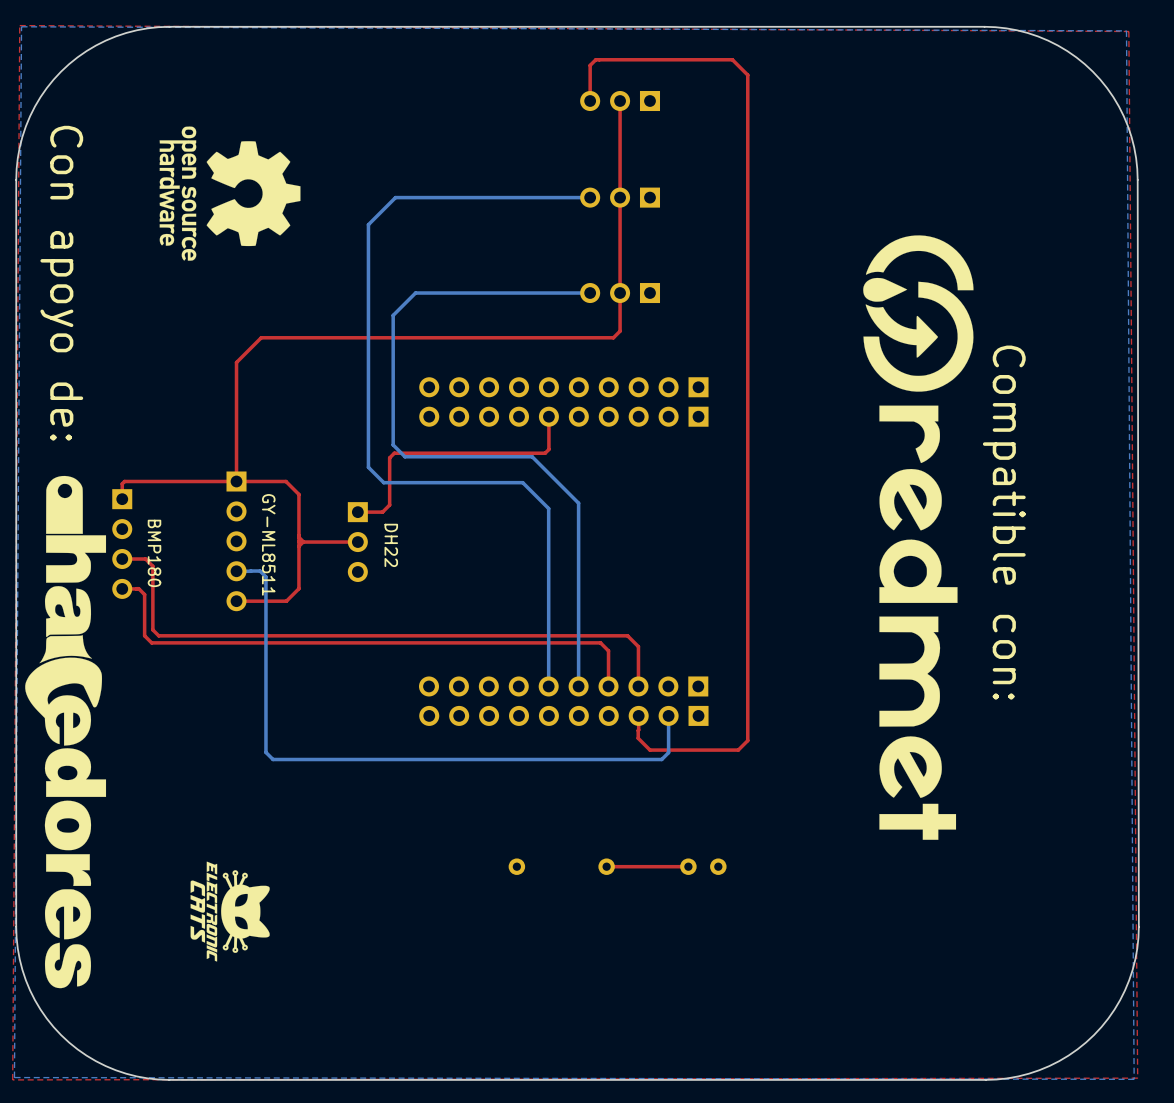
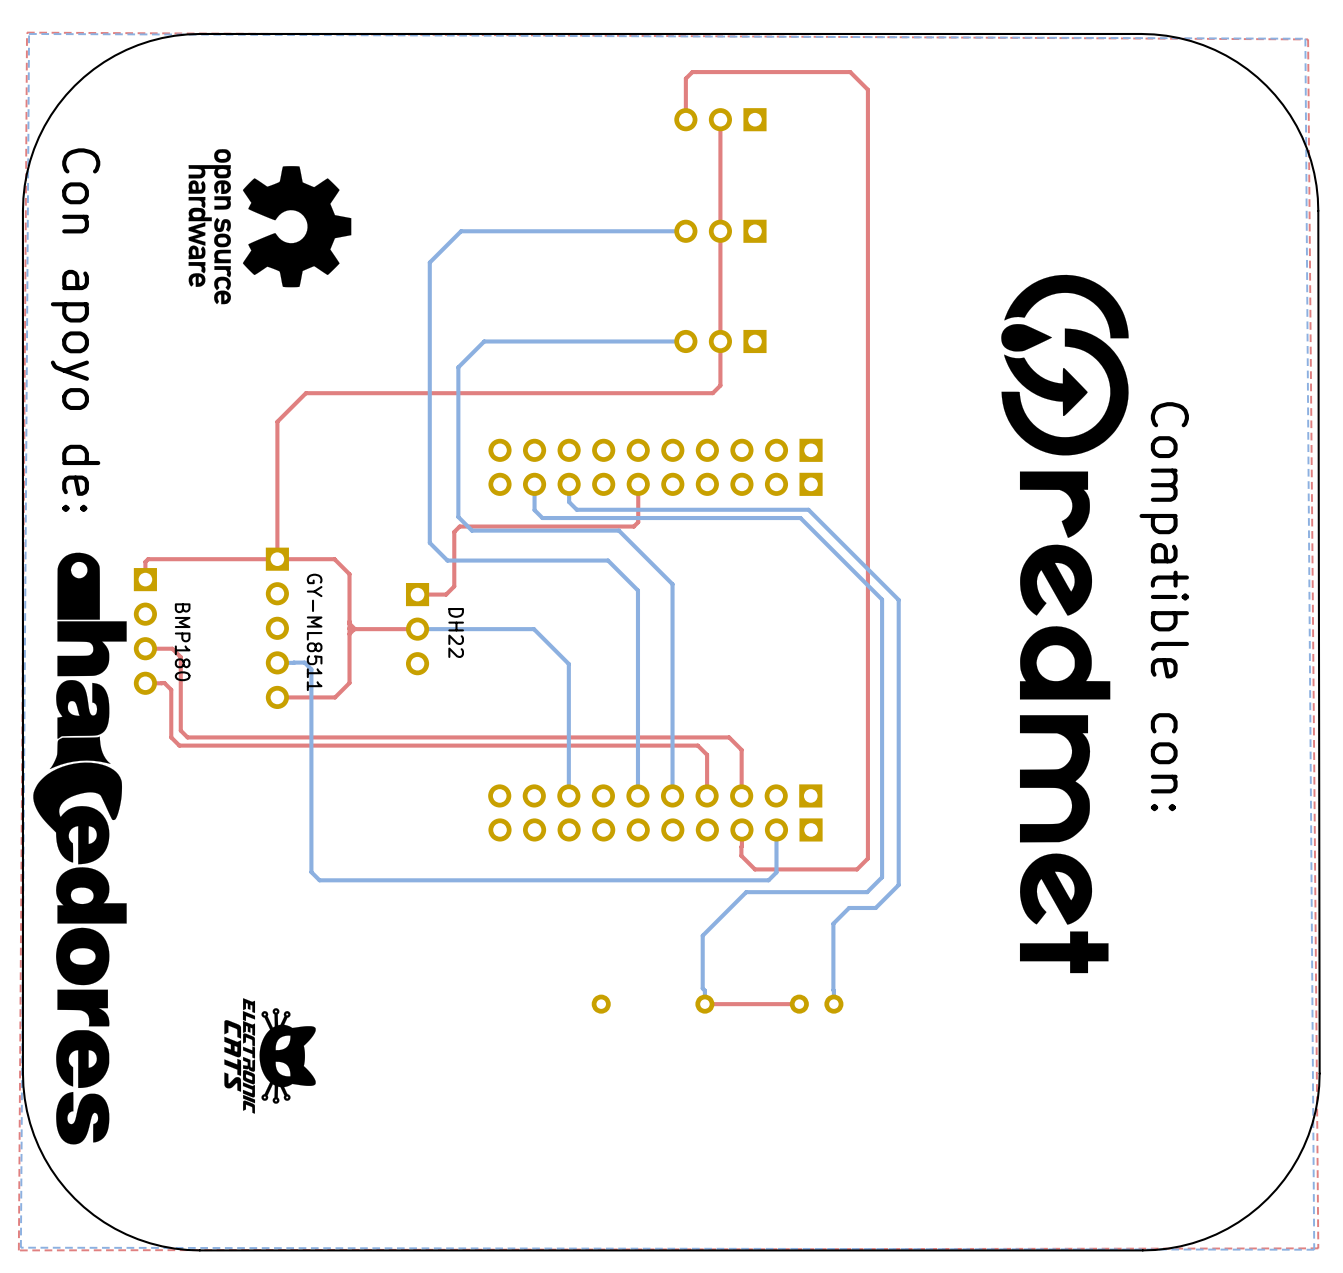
bottom track: none -> (534, 484) (534, 510) (542, 518) (800, 518) (882, 599) (882, 877) (867, 892) (746, 892) (702, 935) (702, 988) (704, 990) (704, 1004)
bottom track: none -> (569, 484) (569, 502) (576, 509) (808, 509) (898, 599) (898, 885) (875, 907) (849, 907) (833, 923) (833, 1004)
bottom track: none -> (417, 629) (533, 629) (568, 664) (568, 795)

